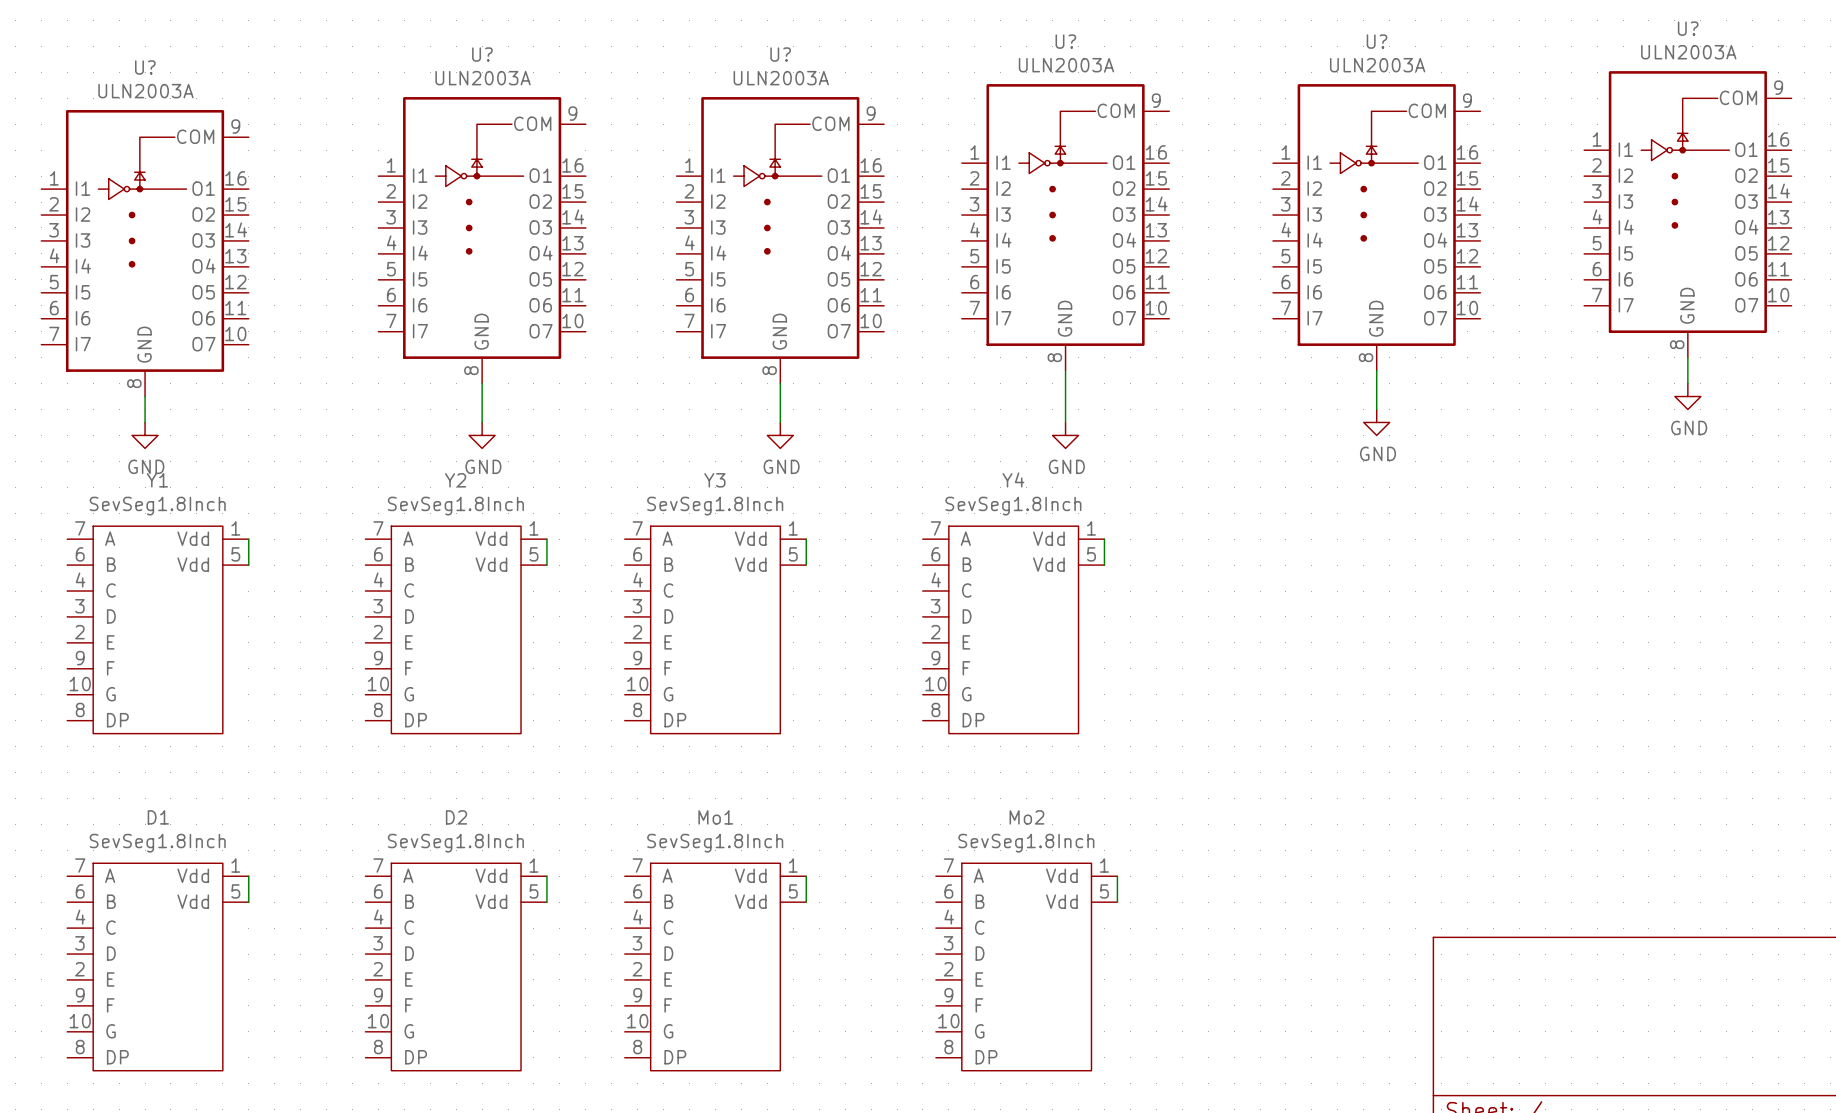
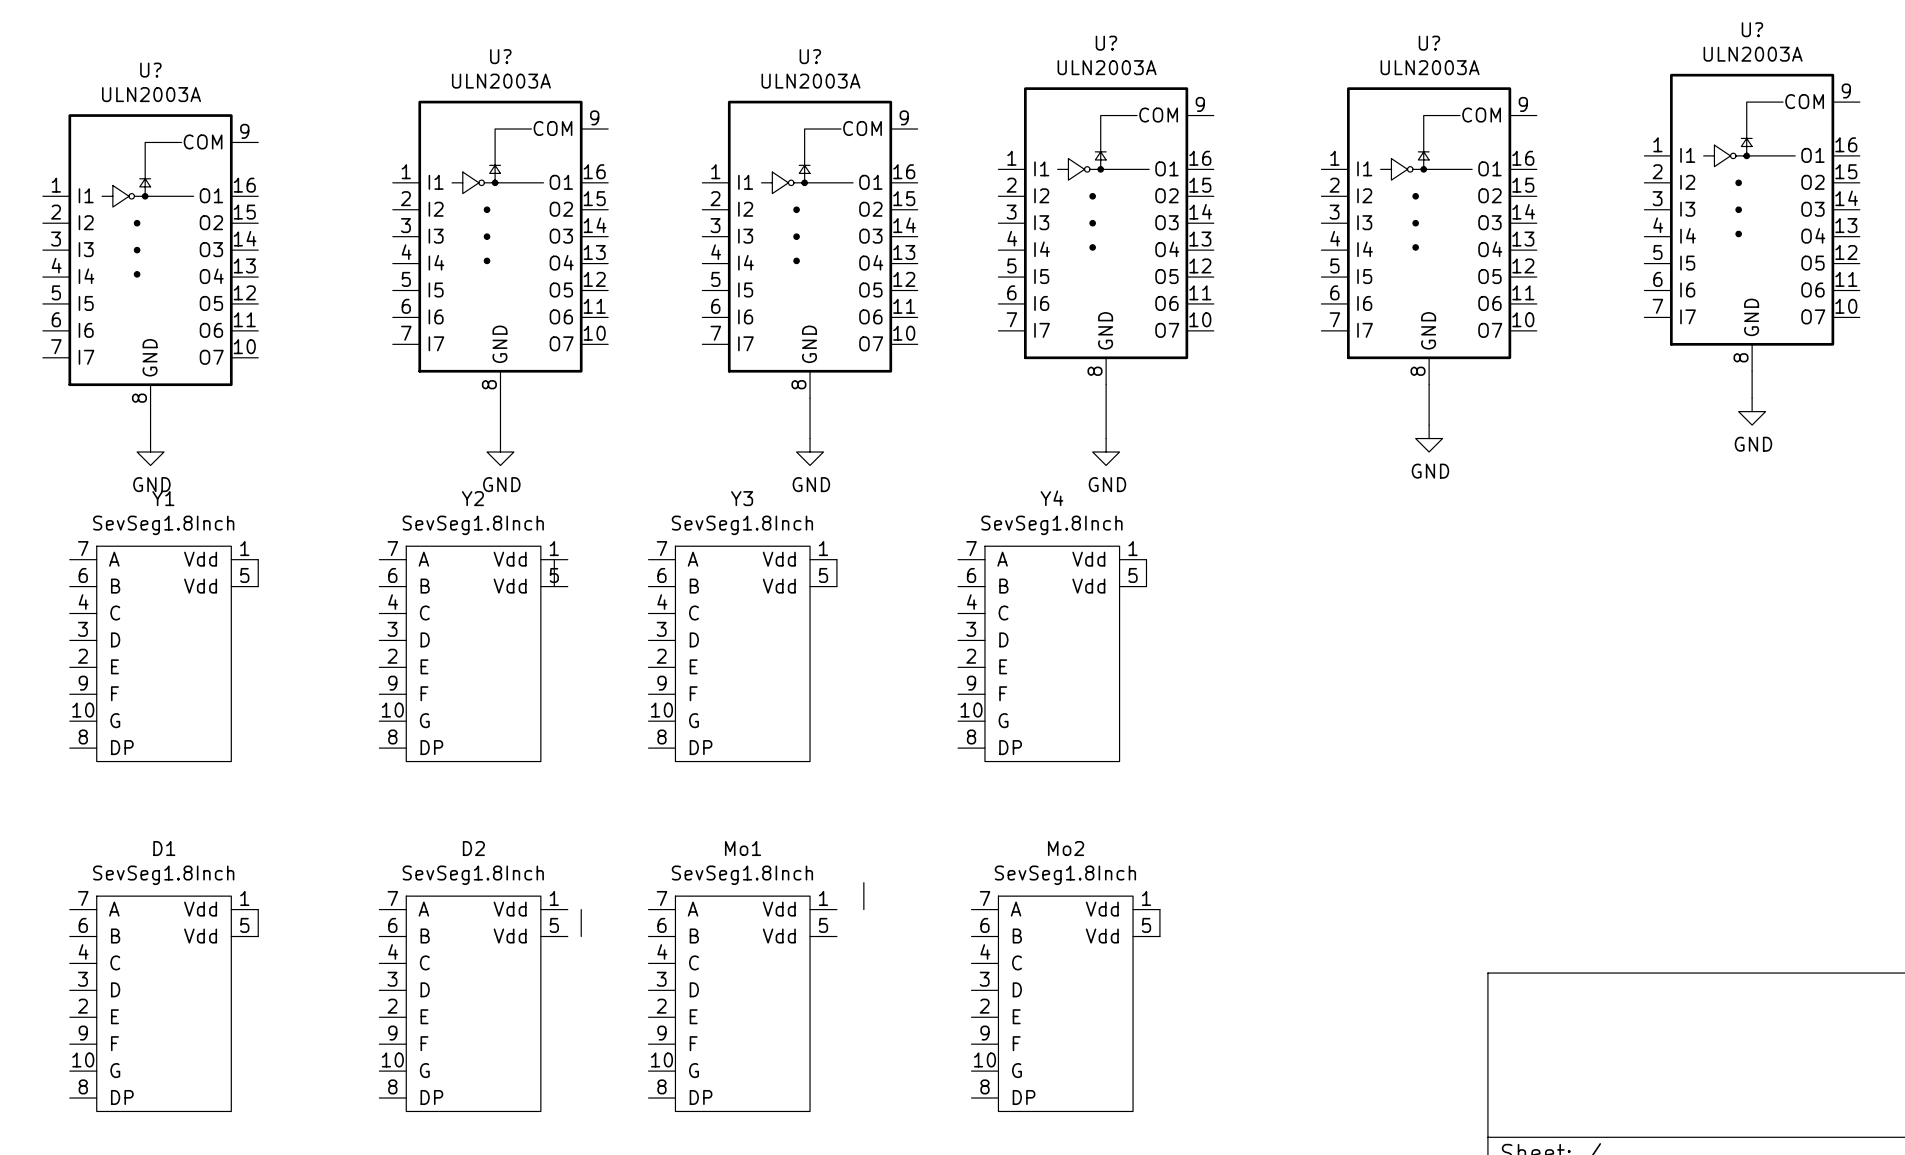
wire: (546, 539) (546, 565) -> (554, 559) (554, 586)
wire: (546, 876) (546, 902) -> (581, 909) (581, 936)
wire: (806, 876) (806, 902) -> (863, 882) (863, 909)

